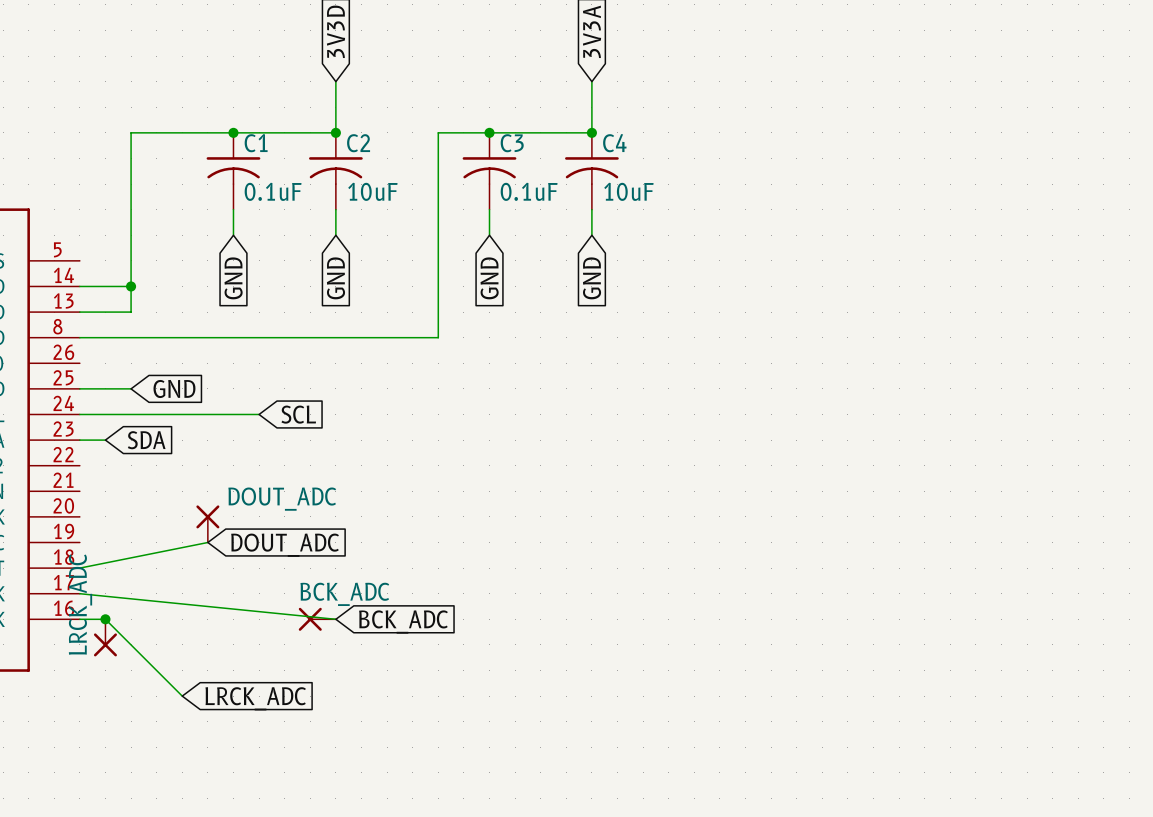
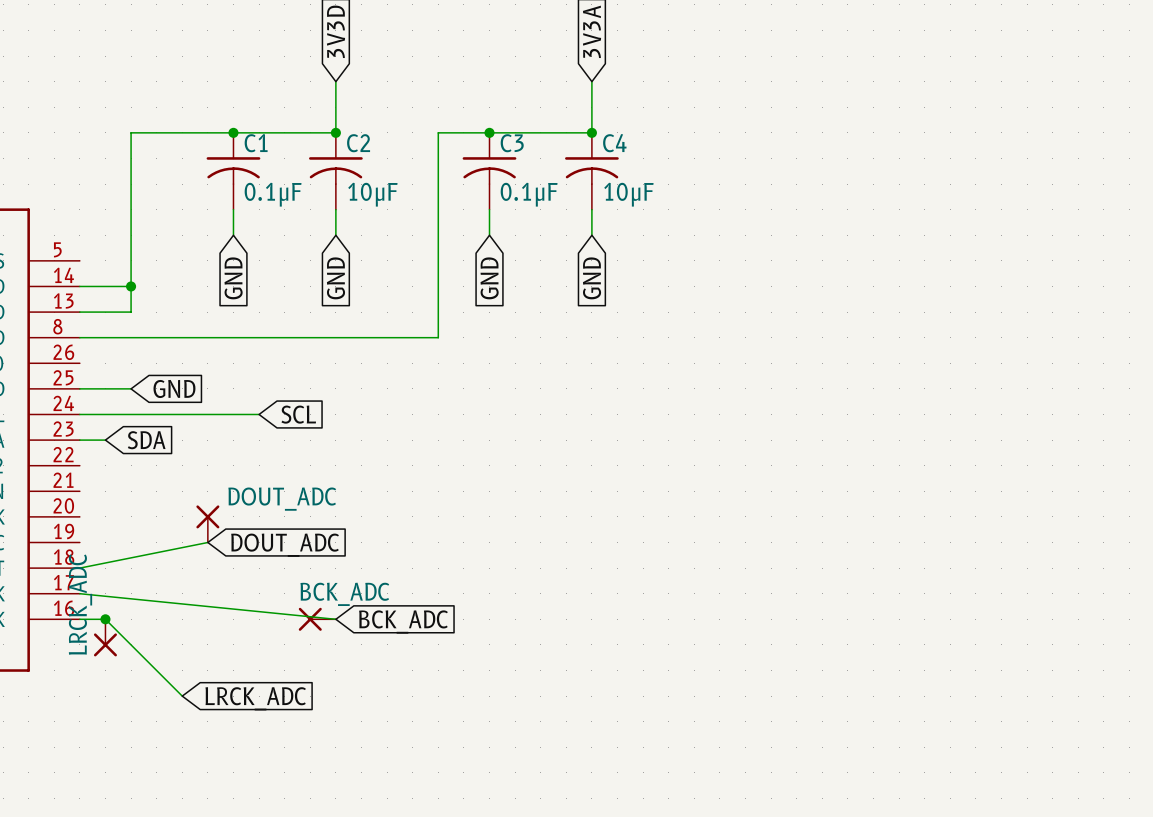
C1 value: 0.1uF (273, 191) -> 0.1μF (273, 194)
C2 value: 10uF (372, 191) -> 10μF (372, 194)
C3 value: 0.1uF (529, 191) -> 0.1μF (529, 194)
C4 value: 10uF (628, 191) -> 10μF (628, 194)

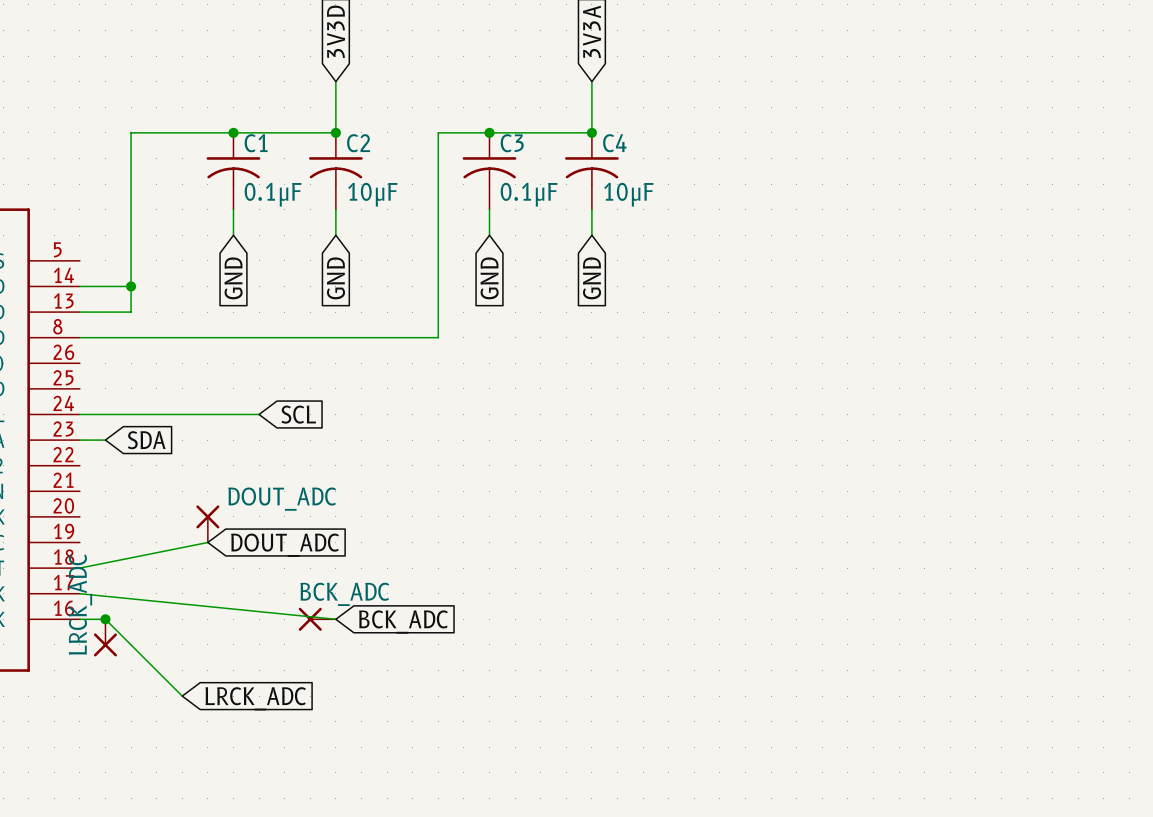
wire: (79, 388) (131, 388) -> none
global label: GND (174, 388) -> none

